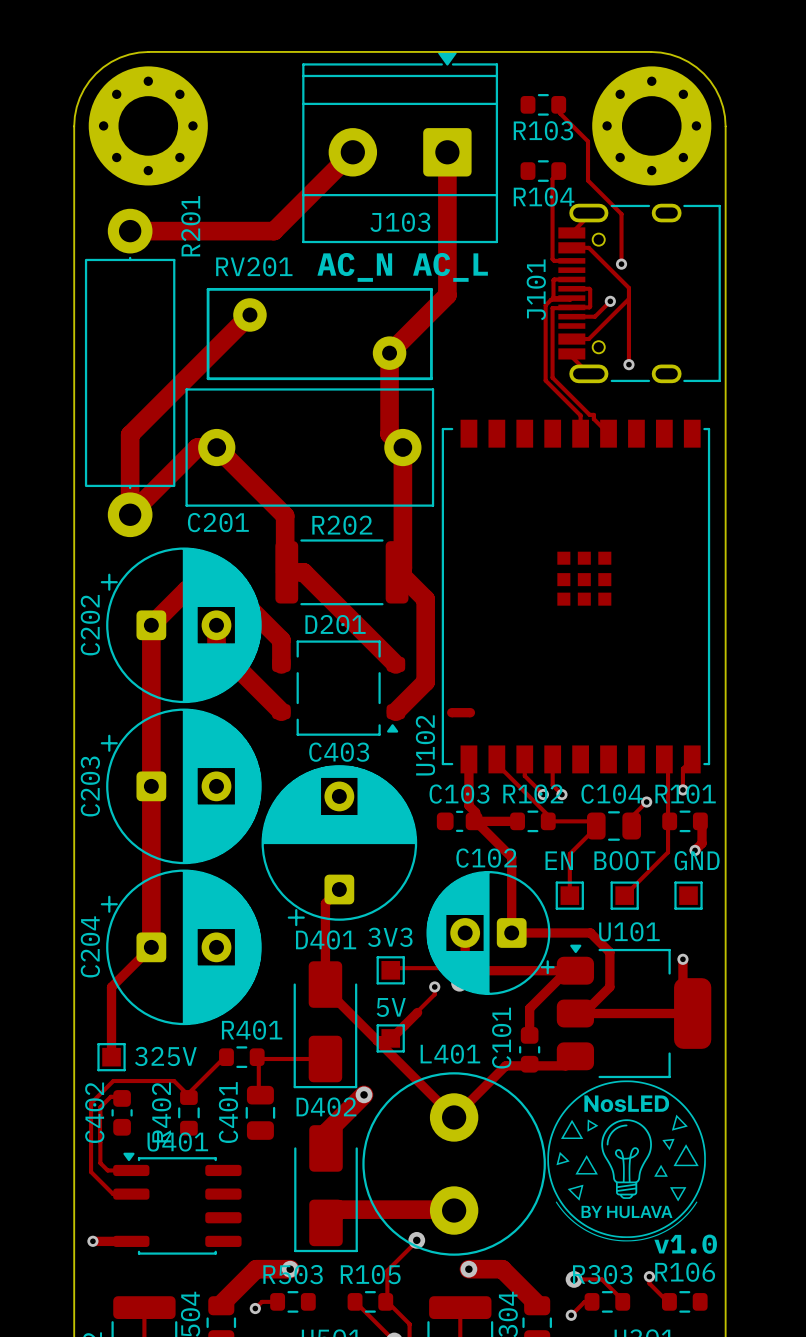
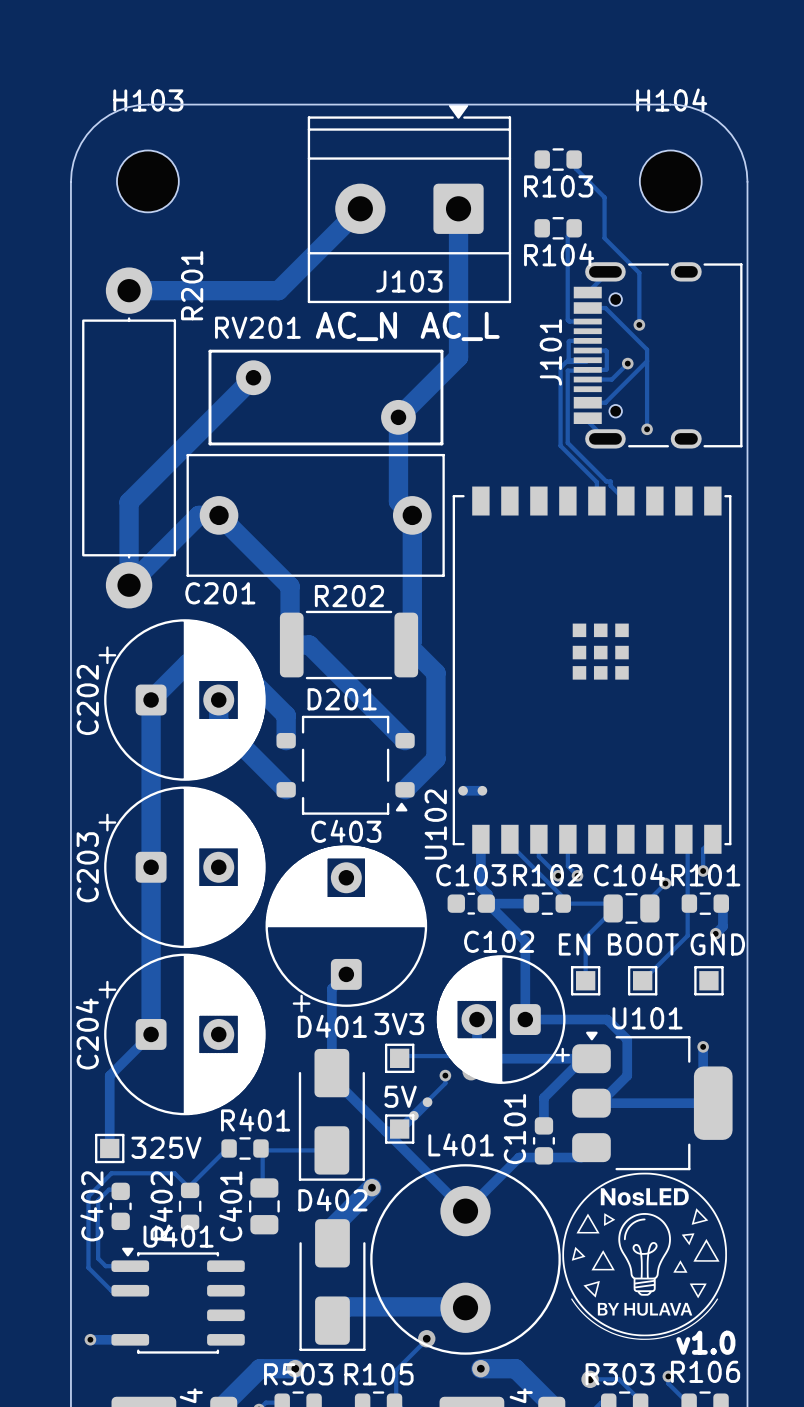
part: (148, 125) -> none
H103: none -> (147, 181)
part: (651, 125) -> none
H104: none -> (670, 181)

